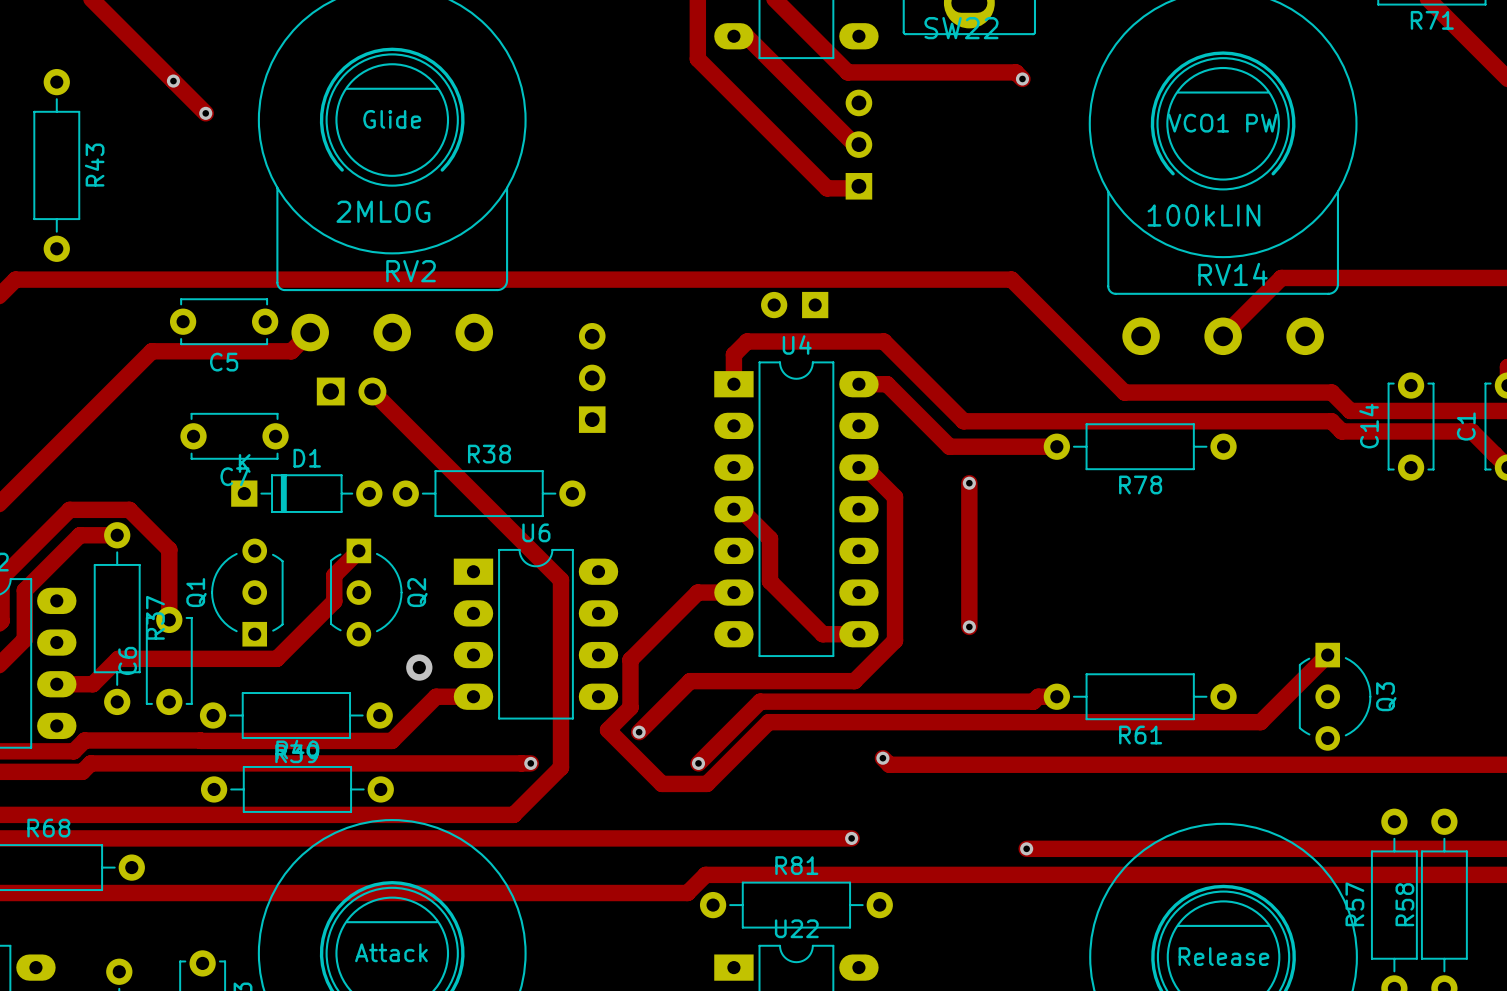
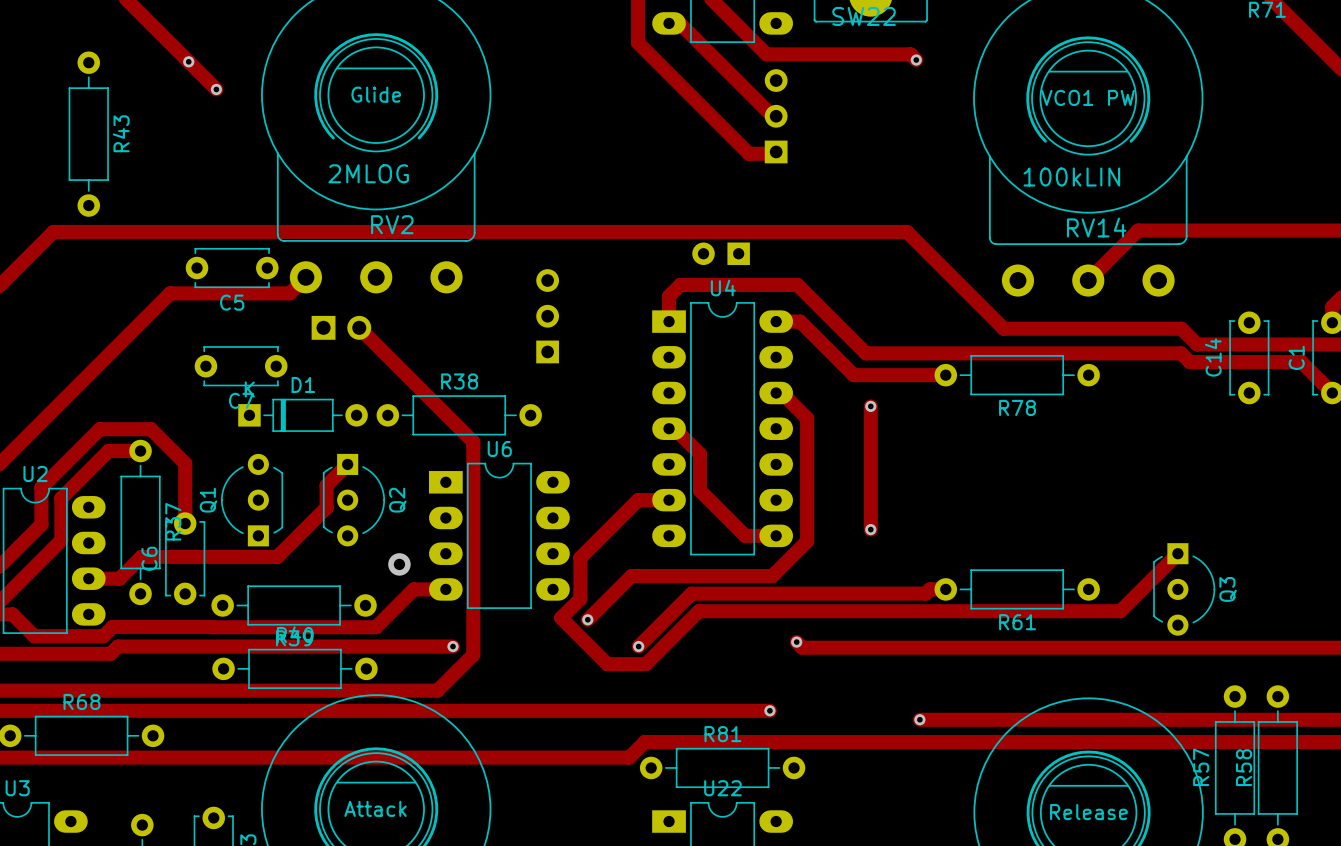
track: (505, 524) (560, 580) (560, 767) (513, 814) (463, 814) -> (473, 441) (473, 654) (437, 690)
track: (481, 763) (530, 763) -> none
via position: (530, 763) -> (453, 646)

